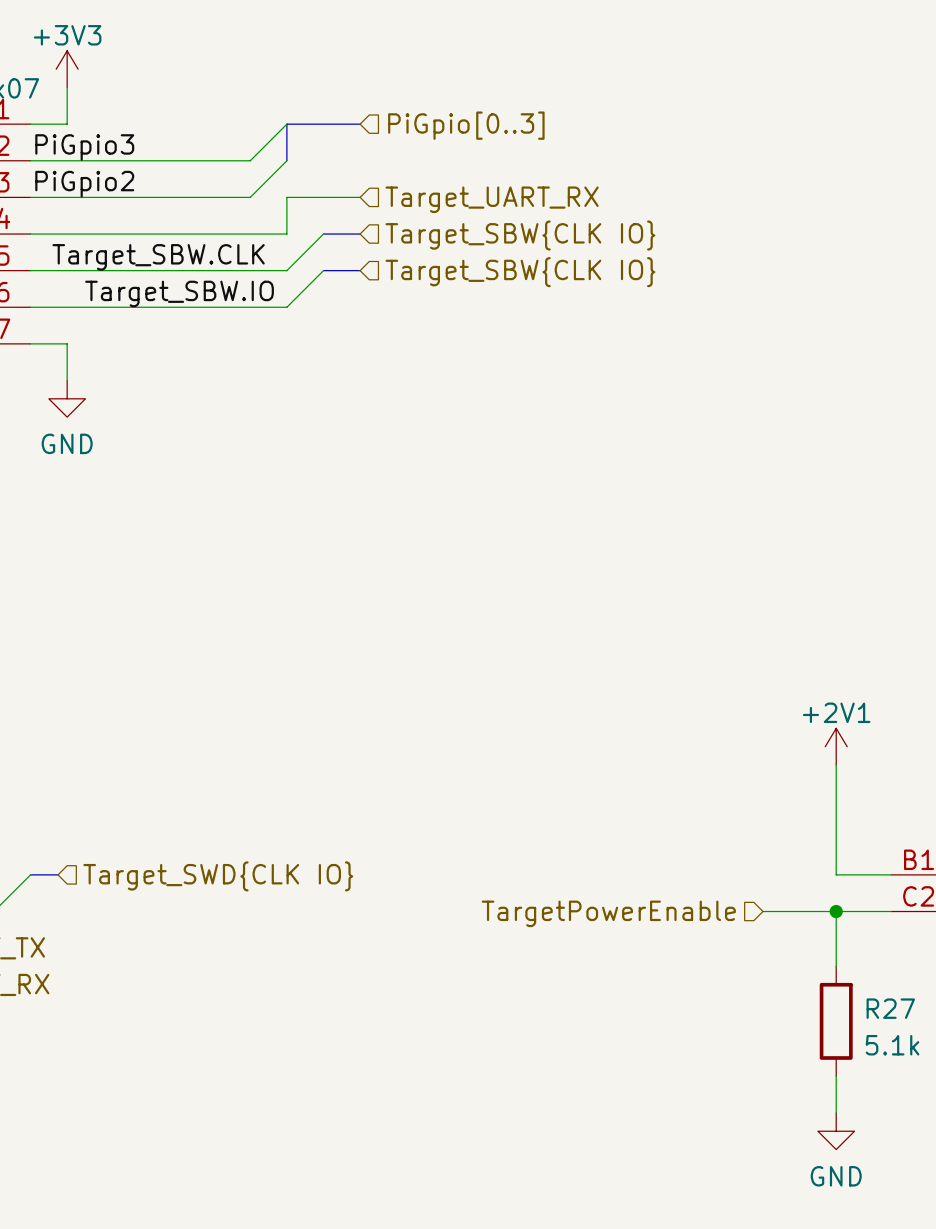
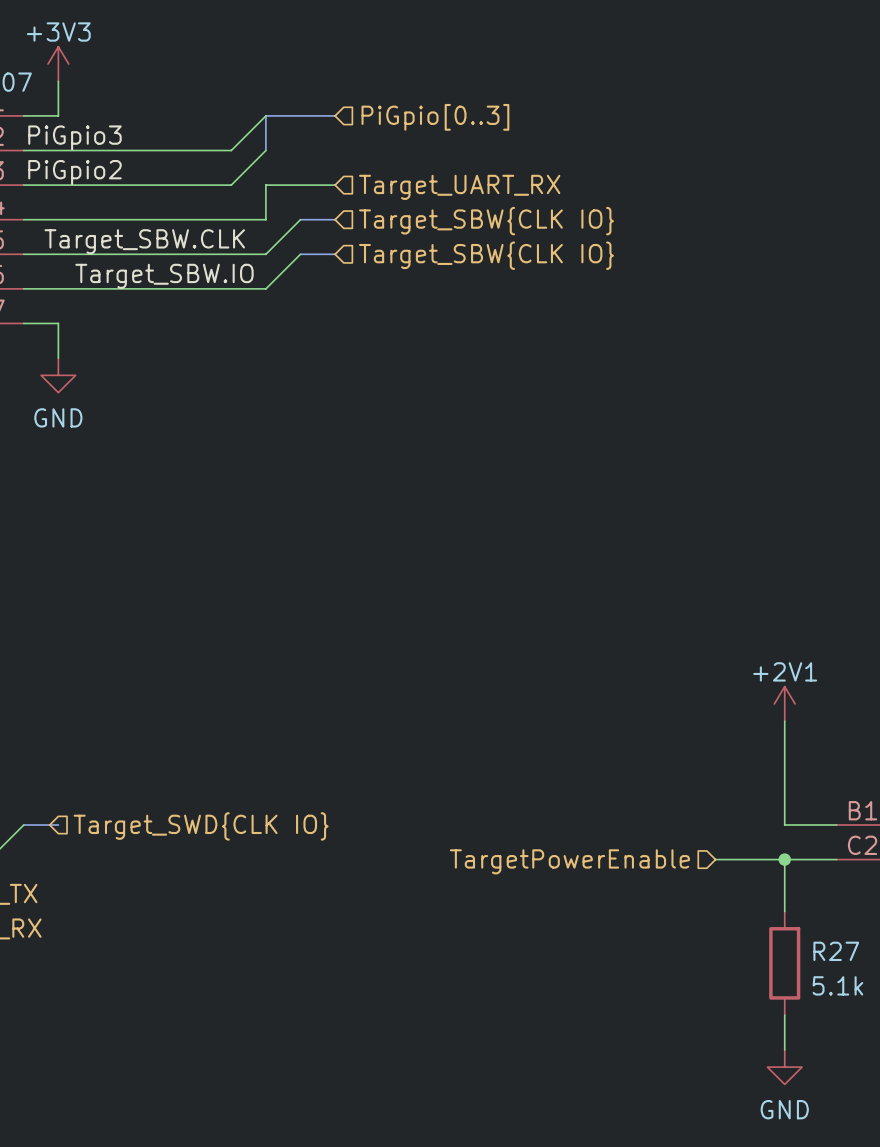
bus: none -> (49, 825) (58, 825)

